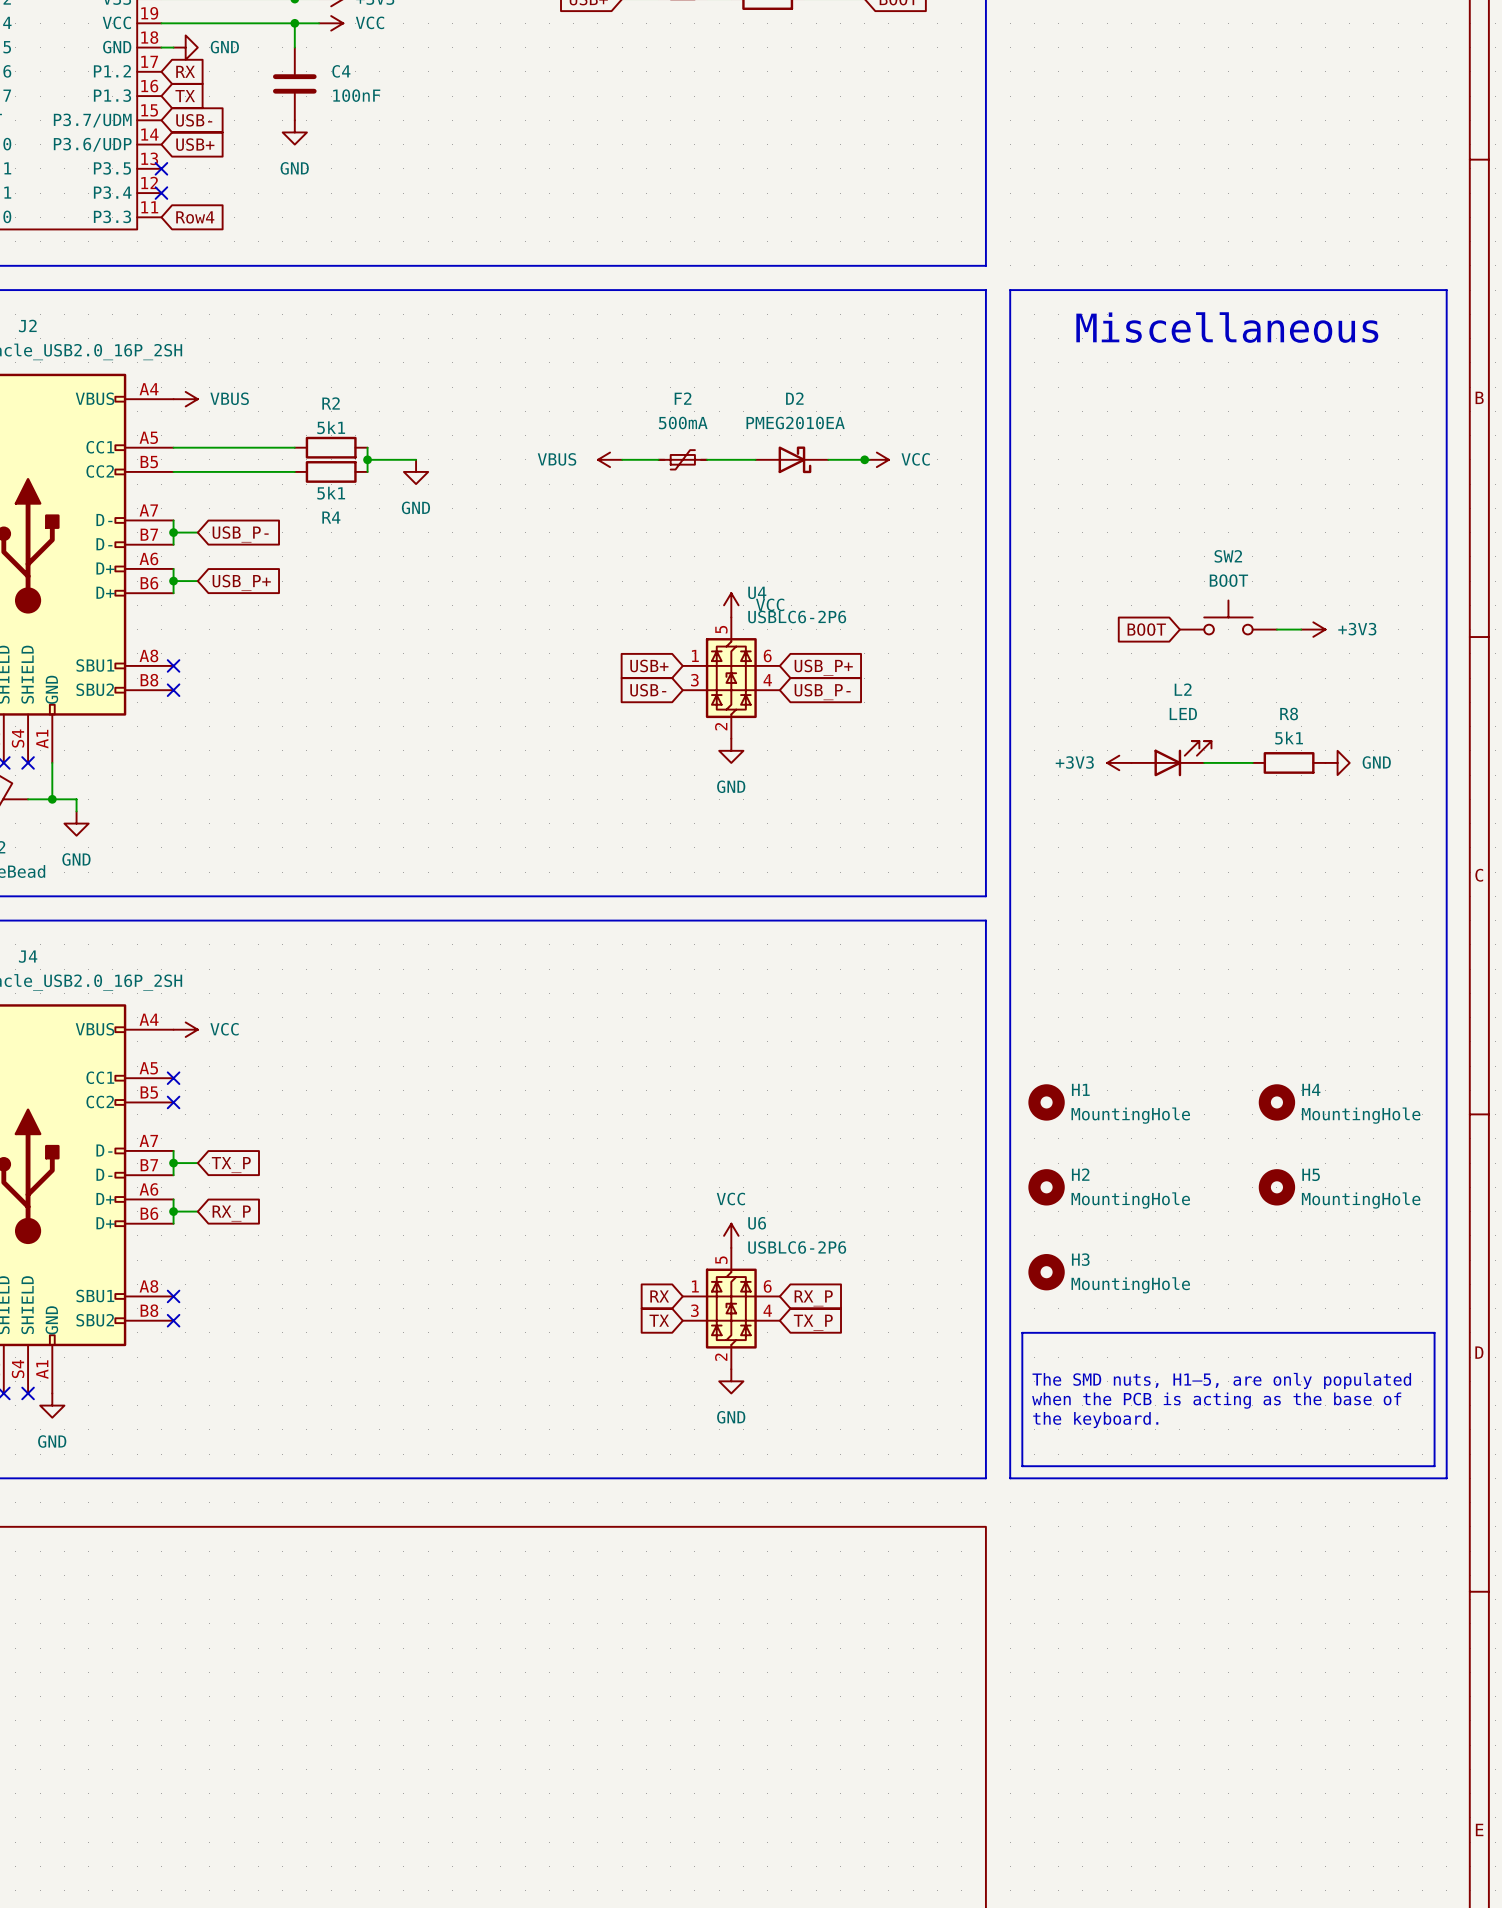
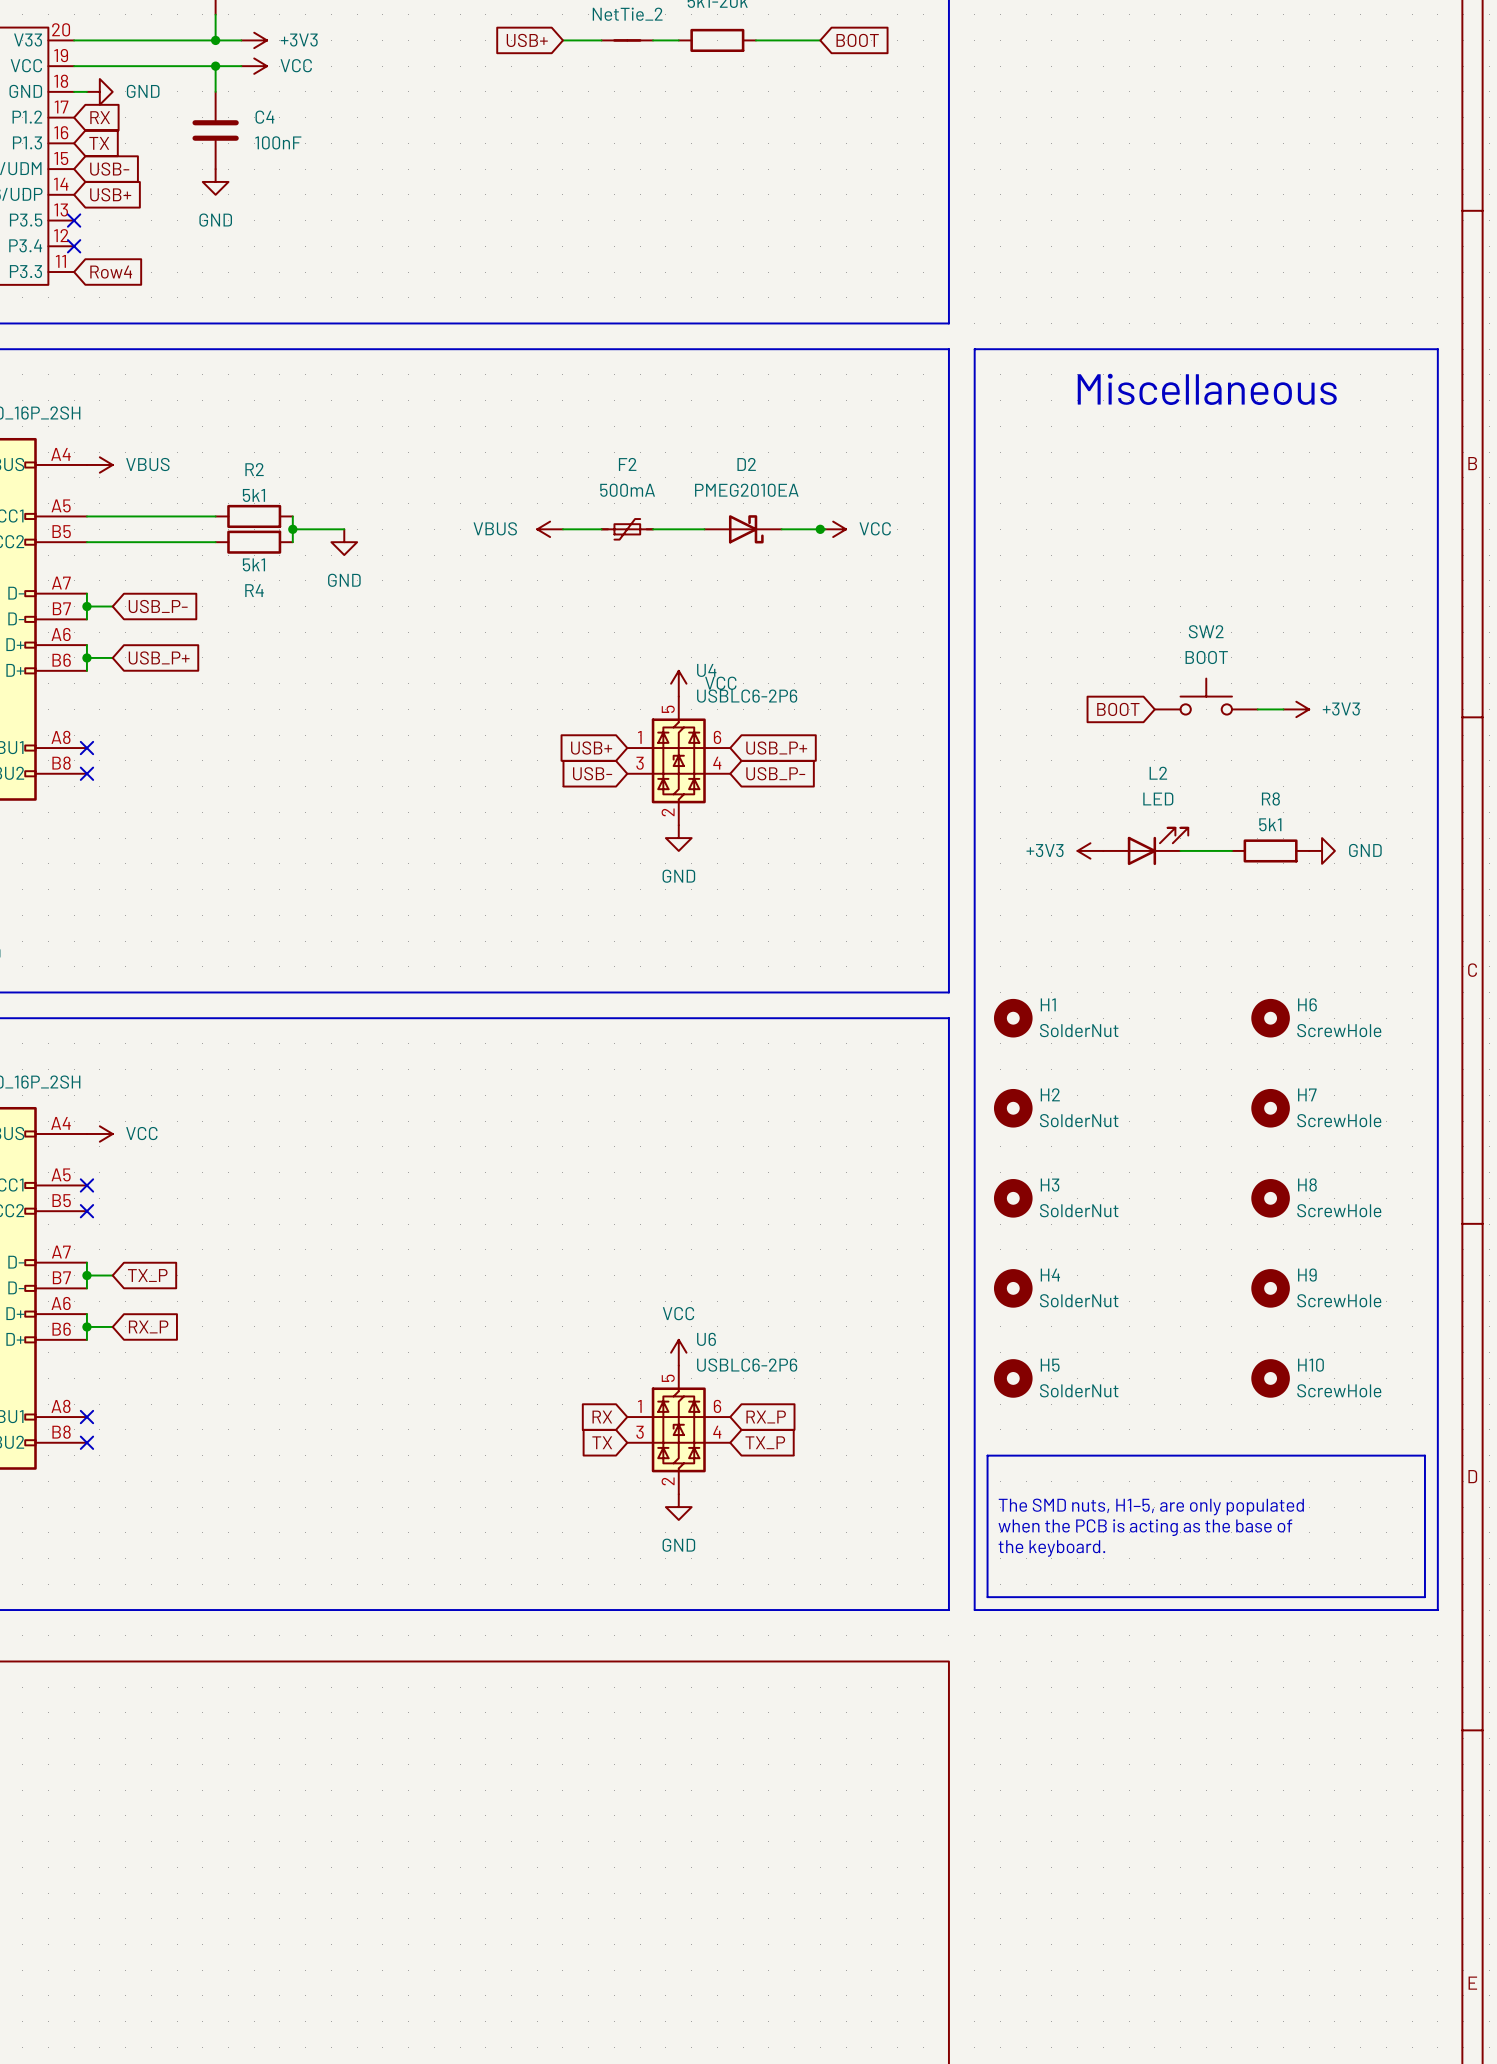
H6: none -> ScrewHole (1270, 1018)
H7: none -> ScrewHole (1270, 1108)
H8: none -> ScrewHole (1270, 1198)
H1 position: (1046, 1102) -> (1013, 1018)
H4 position: (1276, 1102) -> (1013, 1288)
H1 value: MountingHole (1130, 1115) -> SolderNut (1079, 1030)
H4 value: MountingHole (1361, 1115) -> SolderNut (1079, 1300)
H9: none -> ScrewHole (1270, 1288)
H2 position: (1046, 1187) -> (1013, 1108)
H5 position: (1276, 1187) -> (1013, 1378)
H2 value: MountingHole (1130, 1200) -> SolderNut (1079, 1120)
H5 value: MountingHole (1361, 1200) -> SolderNut (1079, 1390)
H10: none -> ScrewHole (1270, 1378)
H3 position: (1046, 1272) -> (1013, 1198)
H3 value: MountingHole (1130, 1285) -> SolderNut (1079, 1210)

